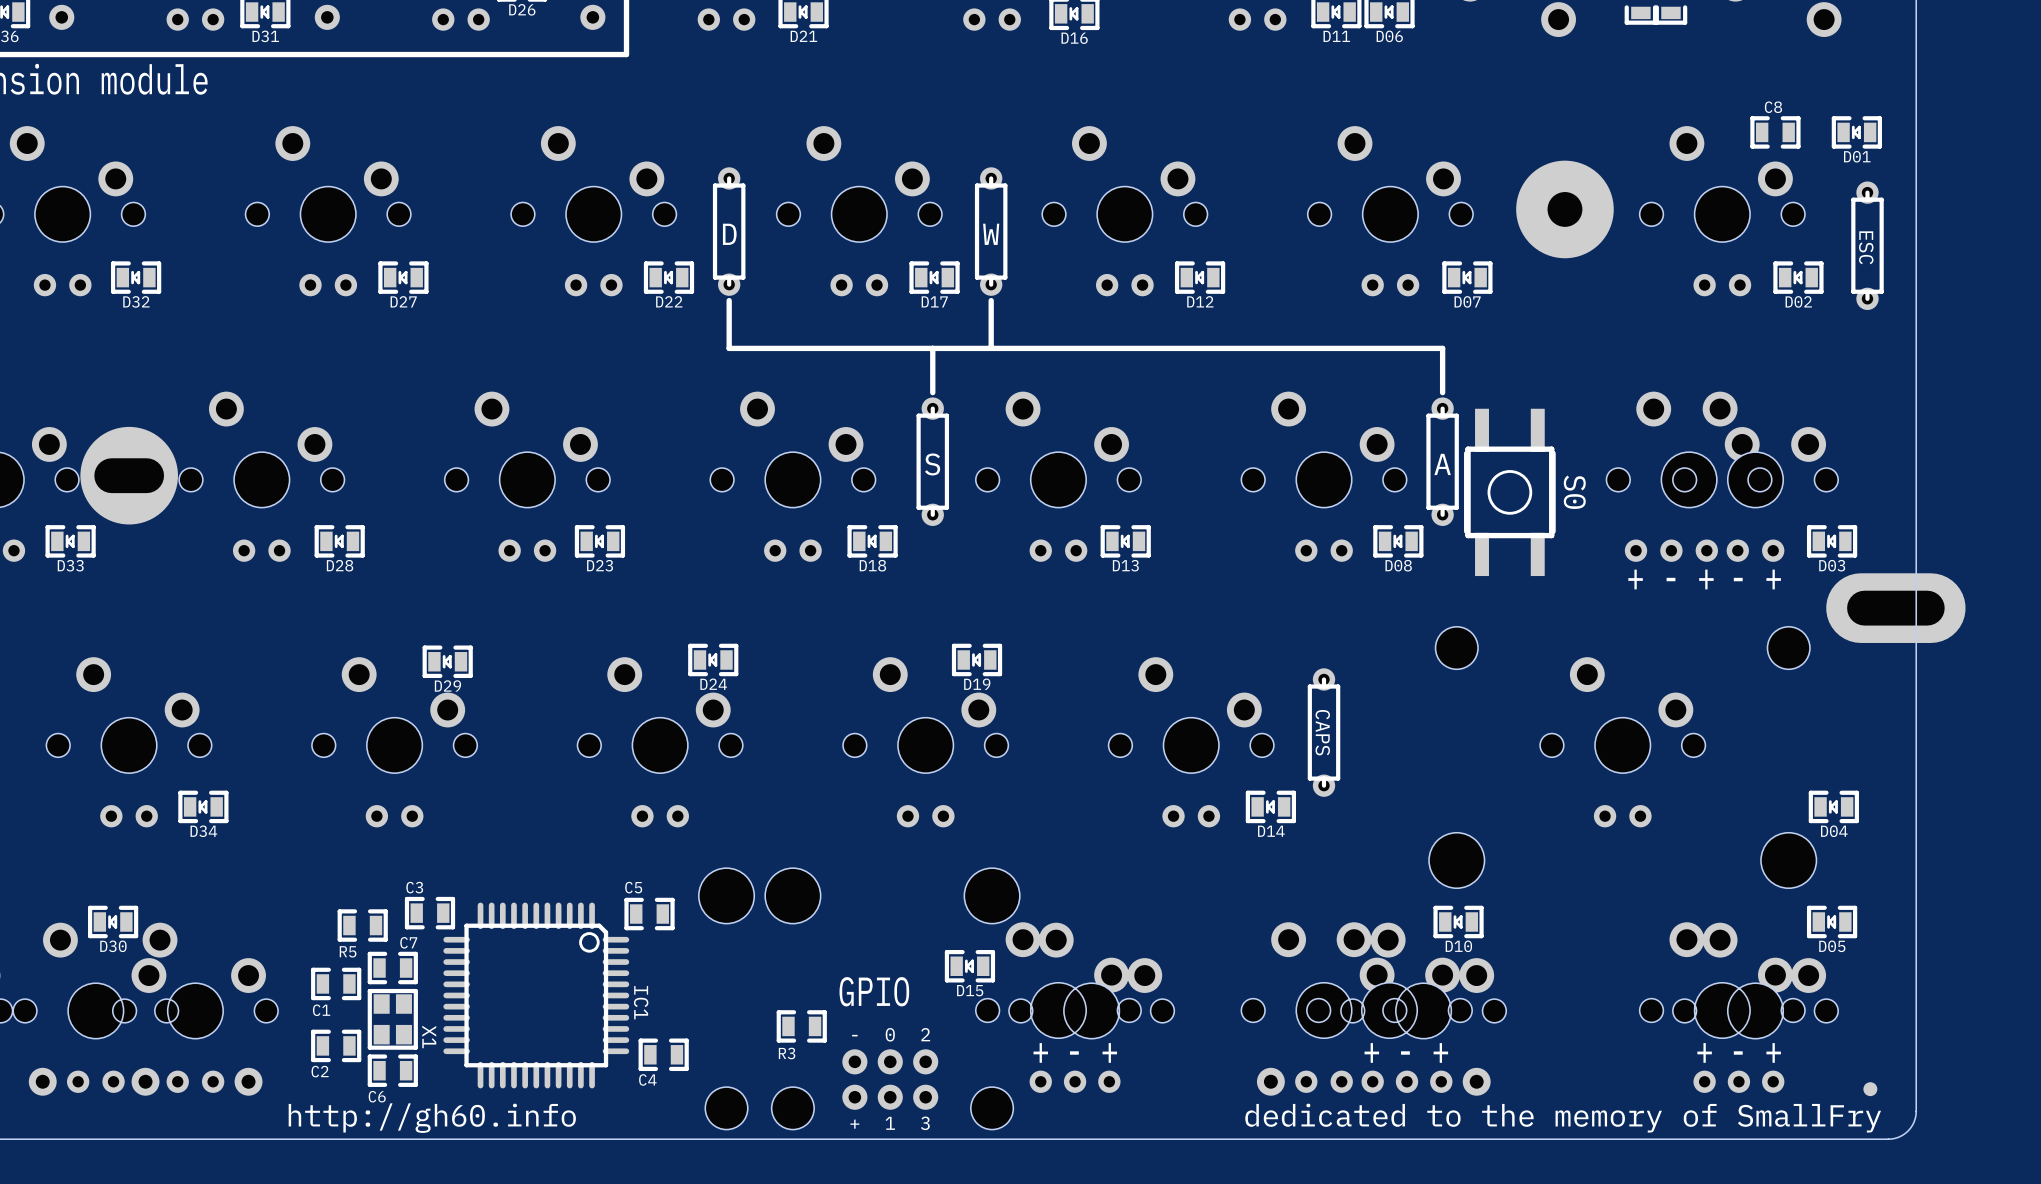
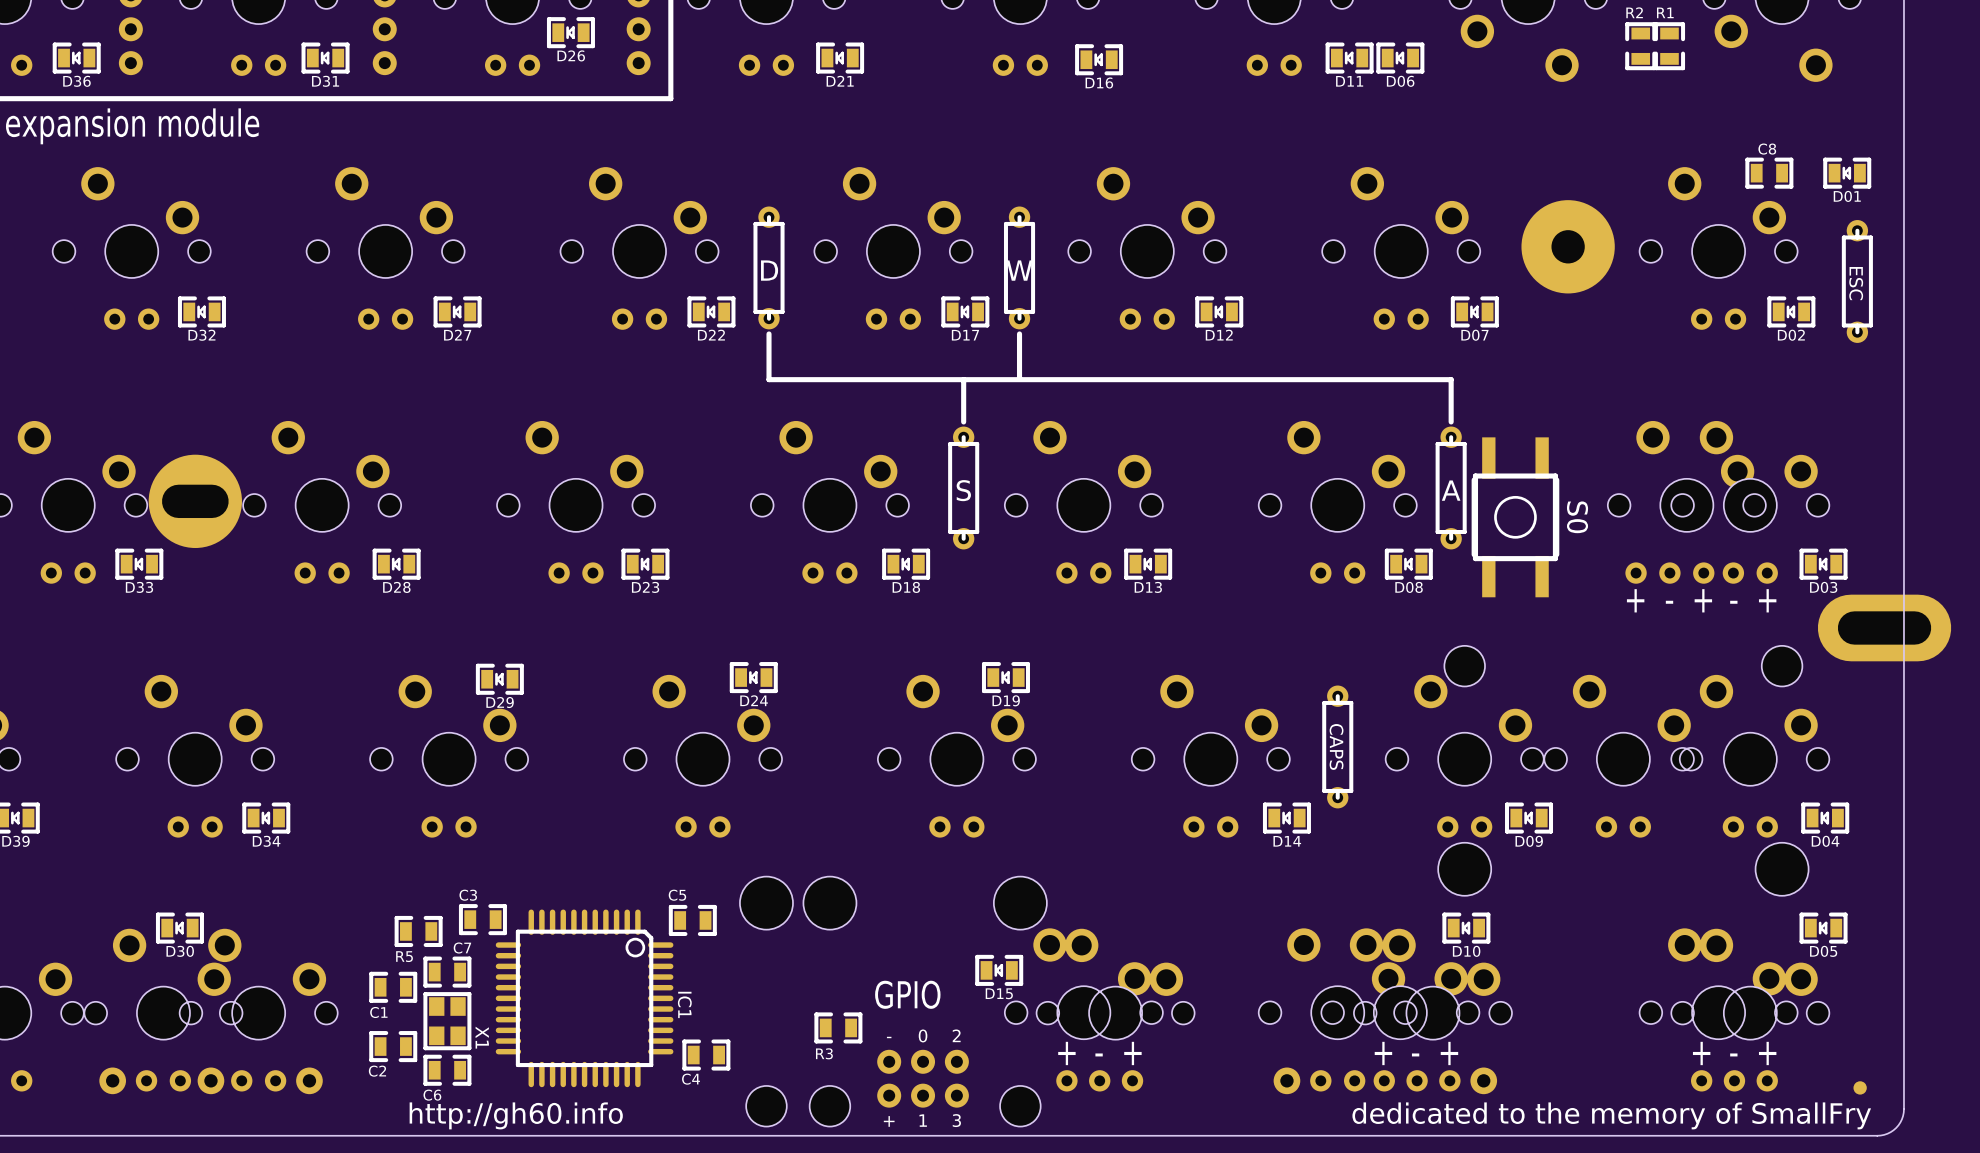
part: none -> (1464, 730)
part: none -> (1750, 730)
D09: none -> (1529, 818)
part: none -> (1464, 826)
part: none -> (1750, 826)

